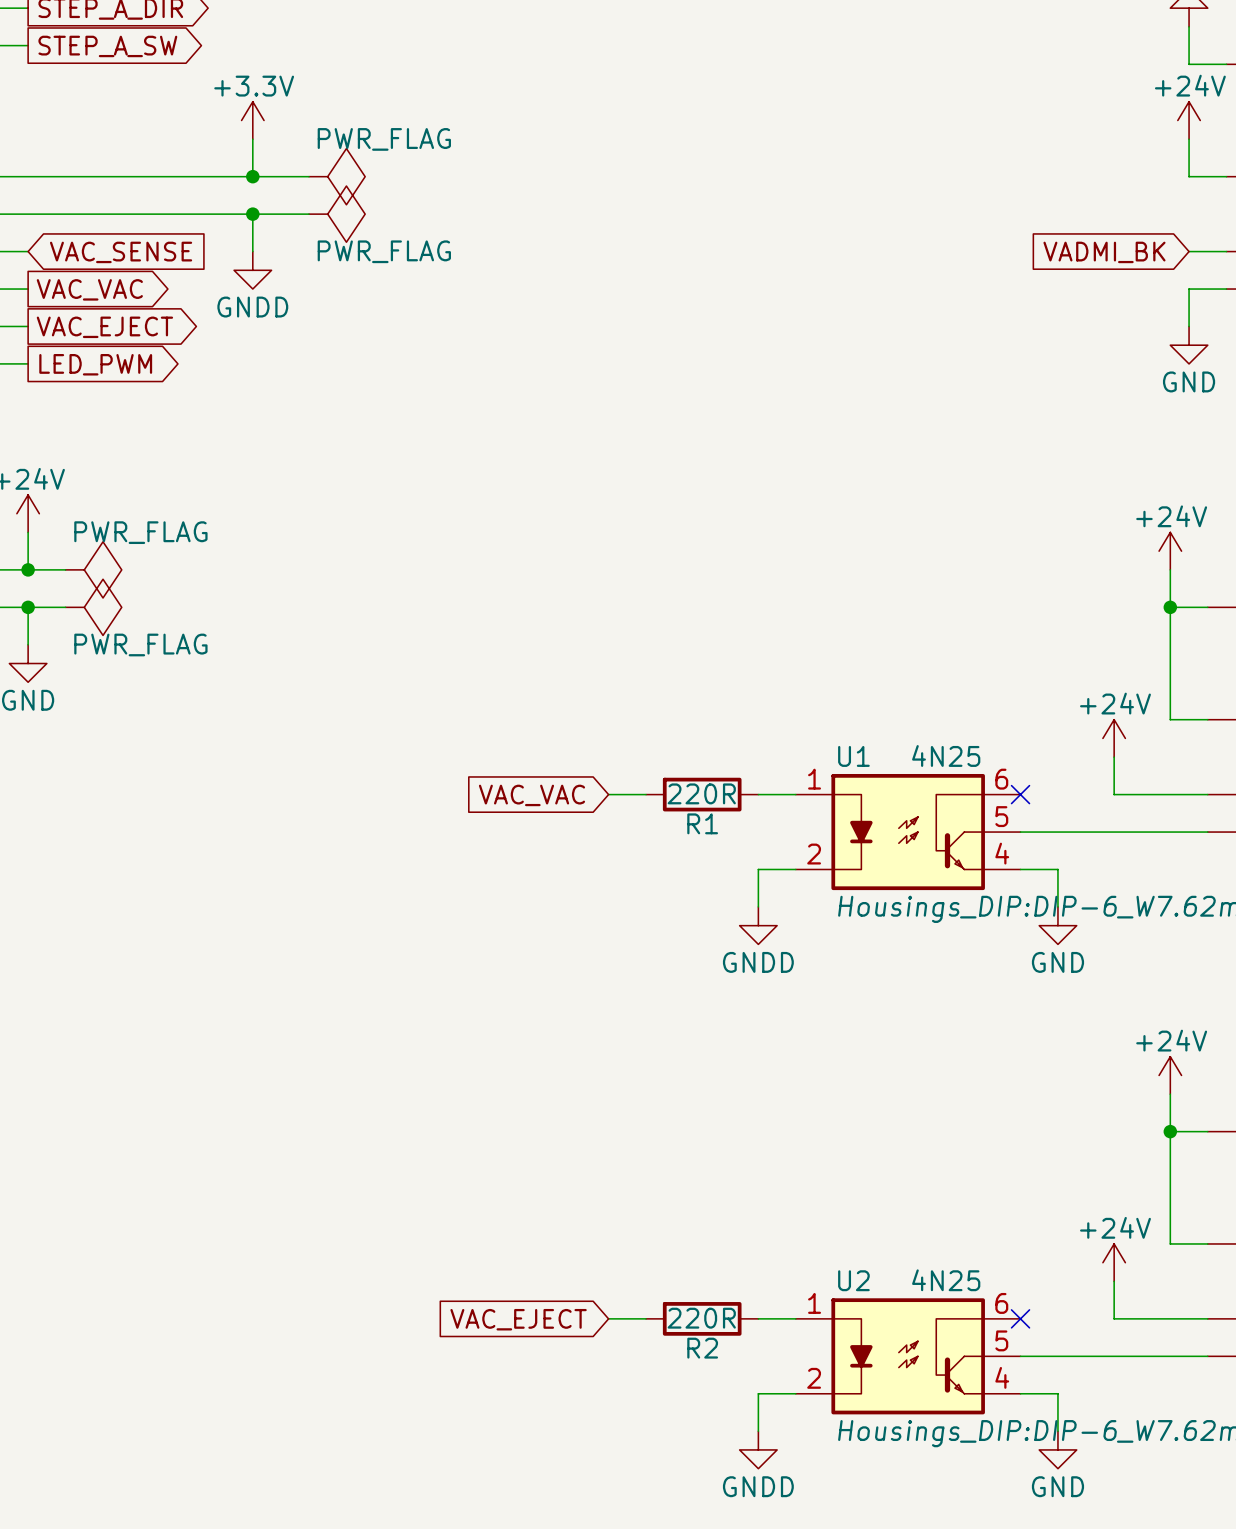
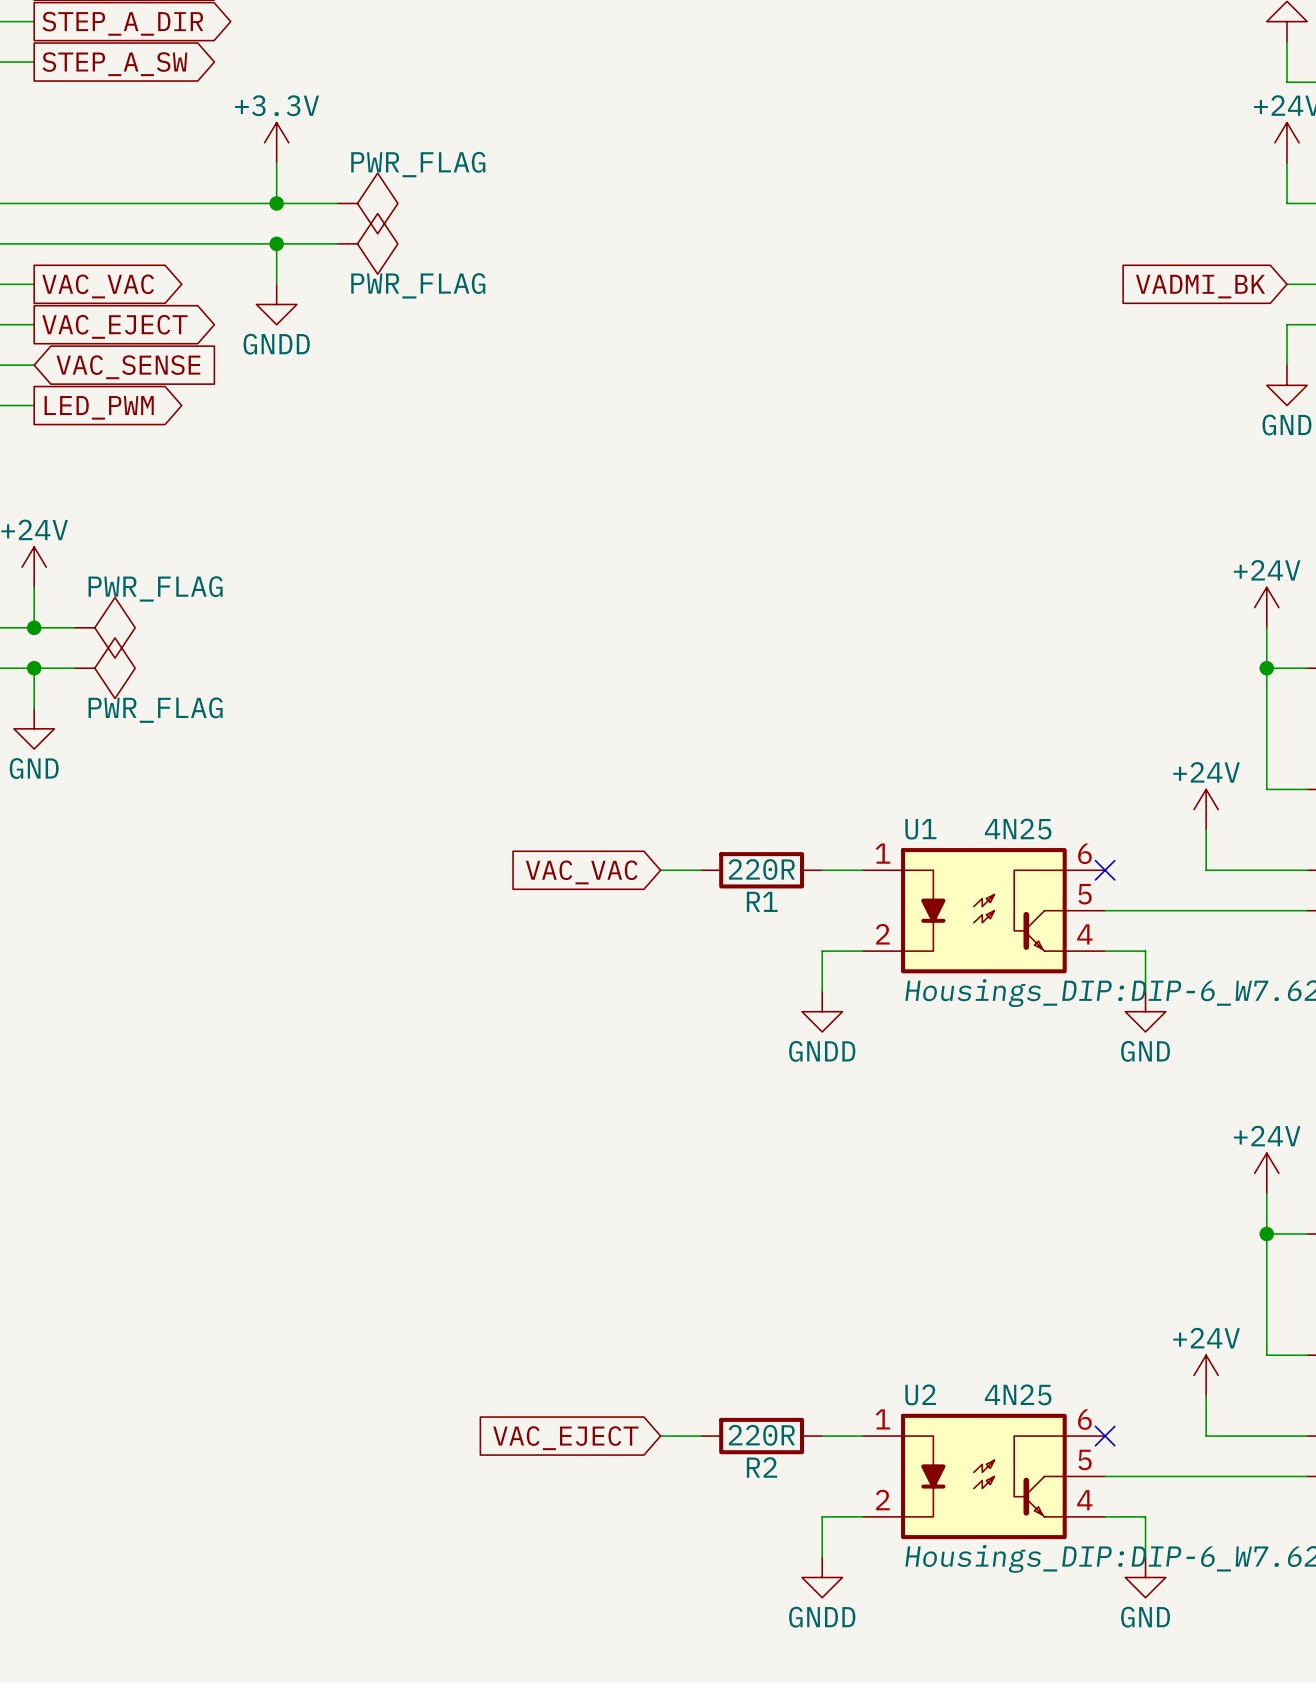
global label shape: input (121, 252) -> output (98, 286)
global label: VAC_SENSE (121, 252) -> VAC_VAC (98, 286)
global label: VAC_VAC (89, 289) -> VAC_EJECT (114, 326)
global label shape: output (104, 327) -> input (128, 367)
global label: VAC_EJECT (104, 327) -> VAC_SENSE (128, 367)

